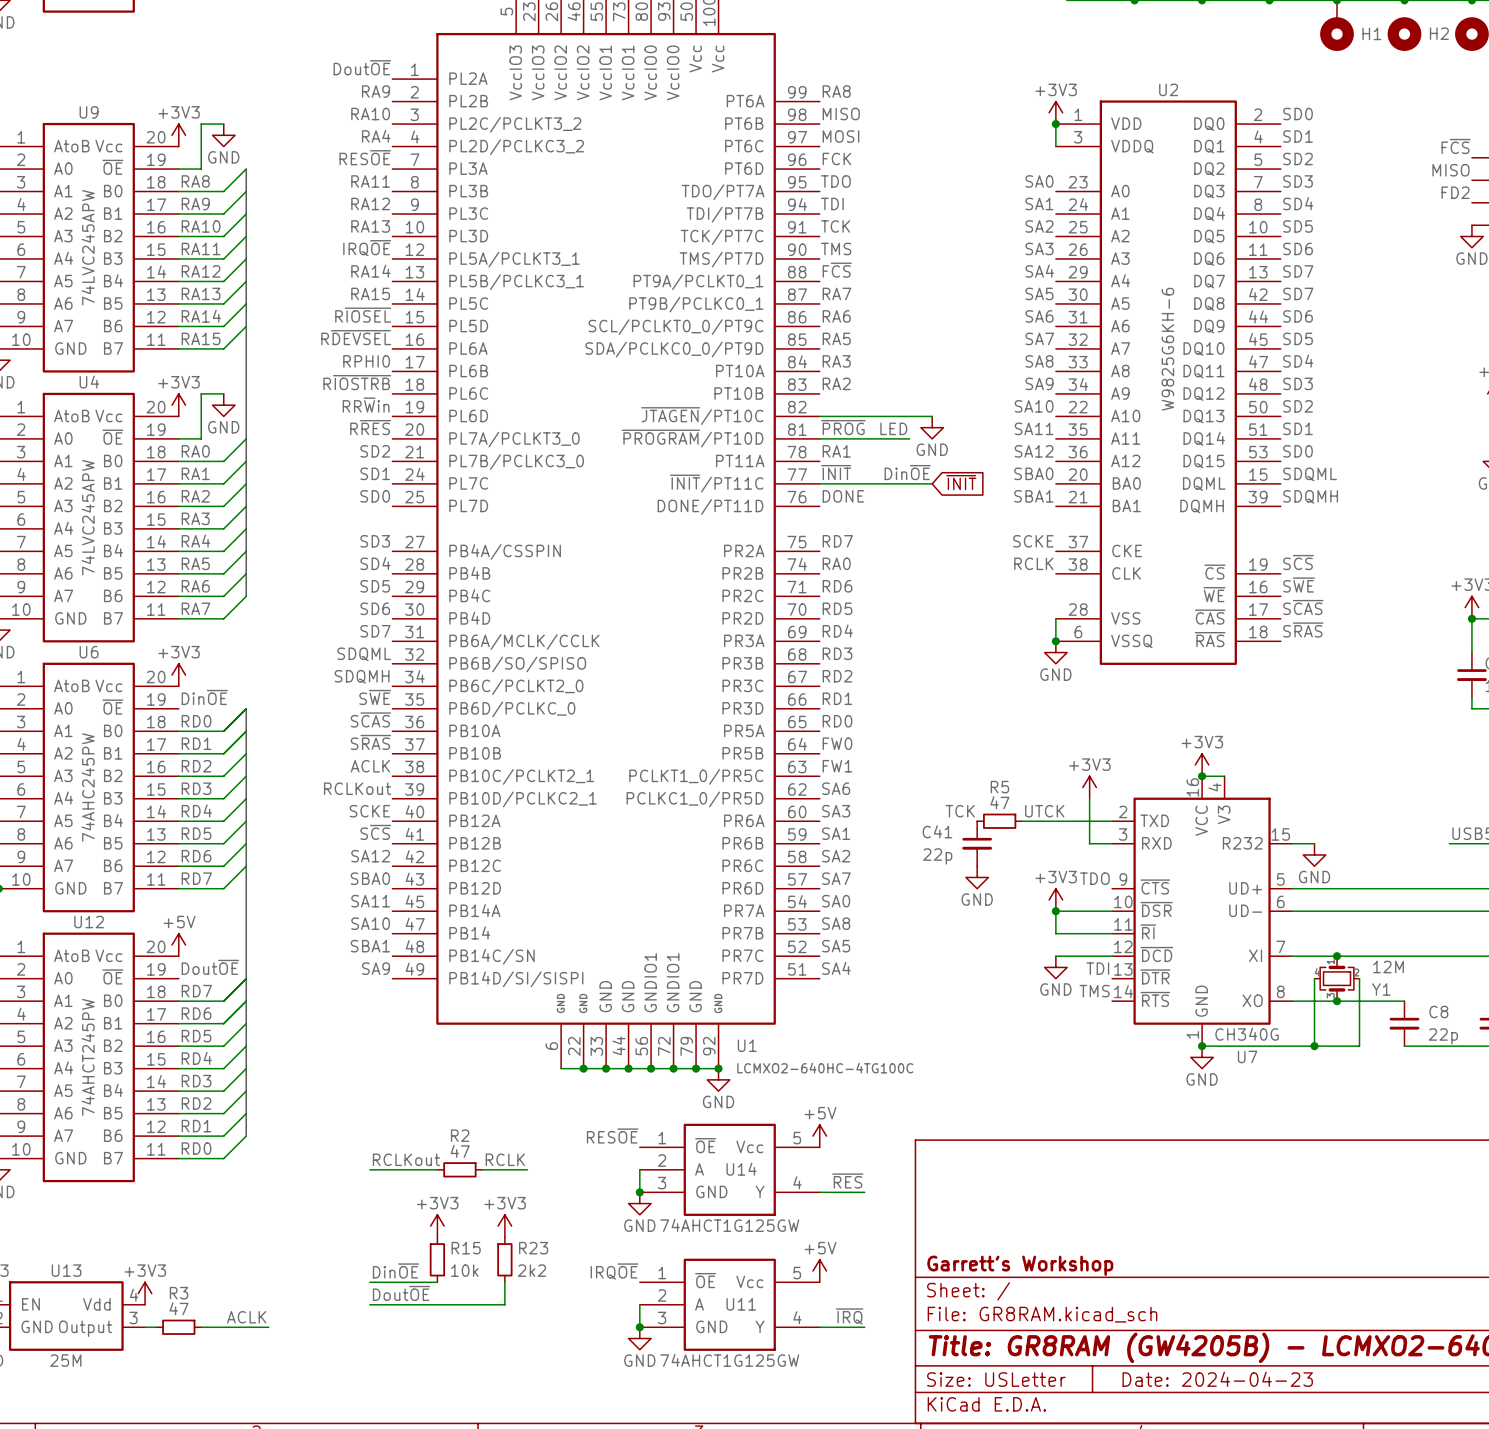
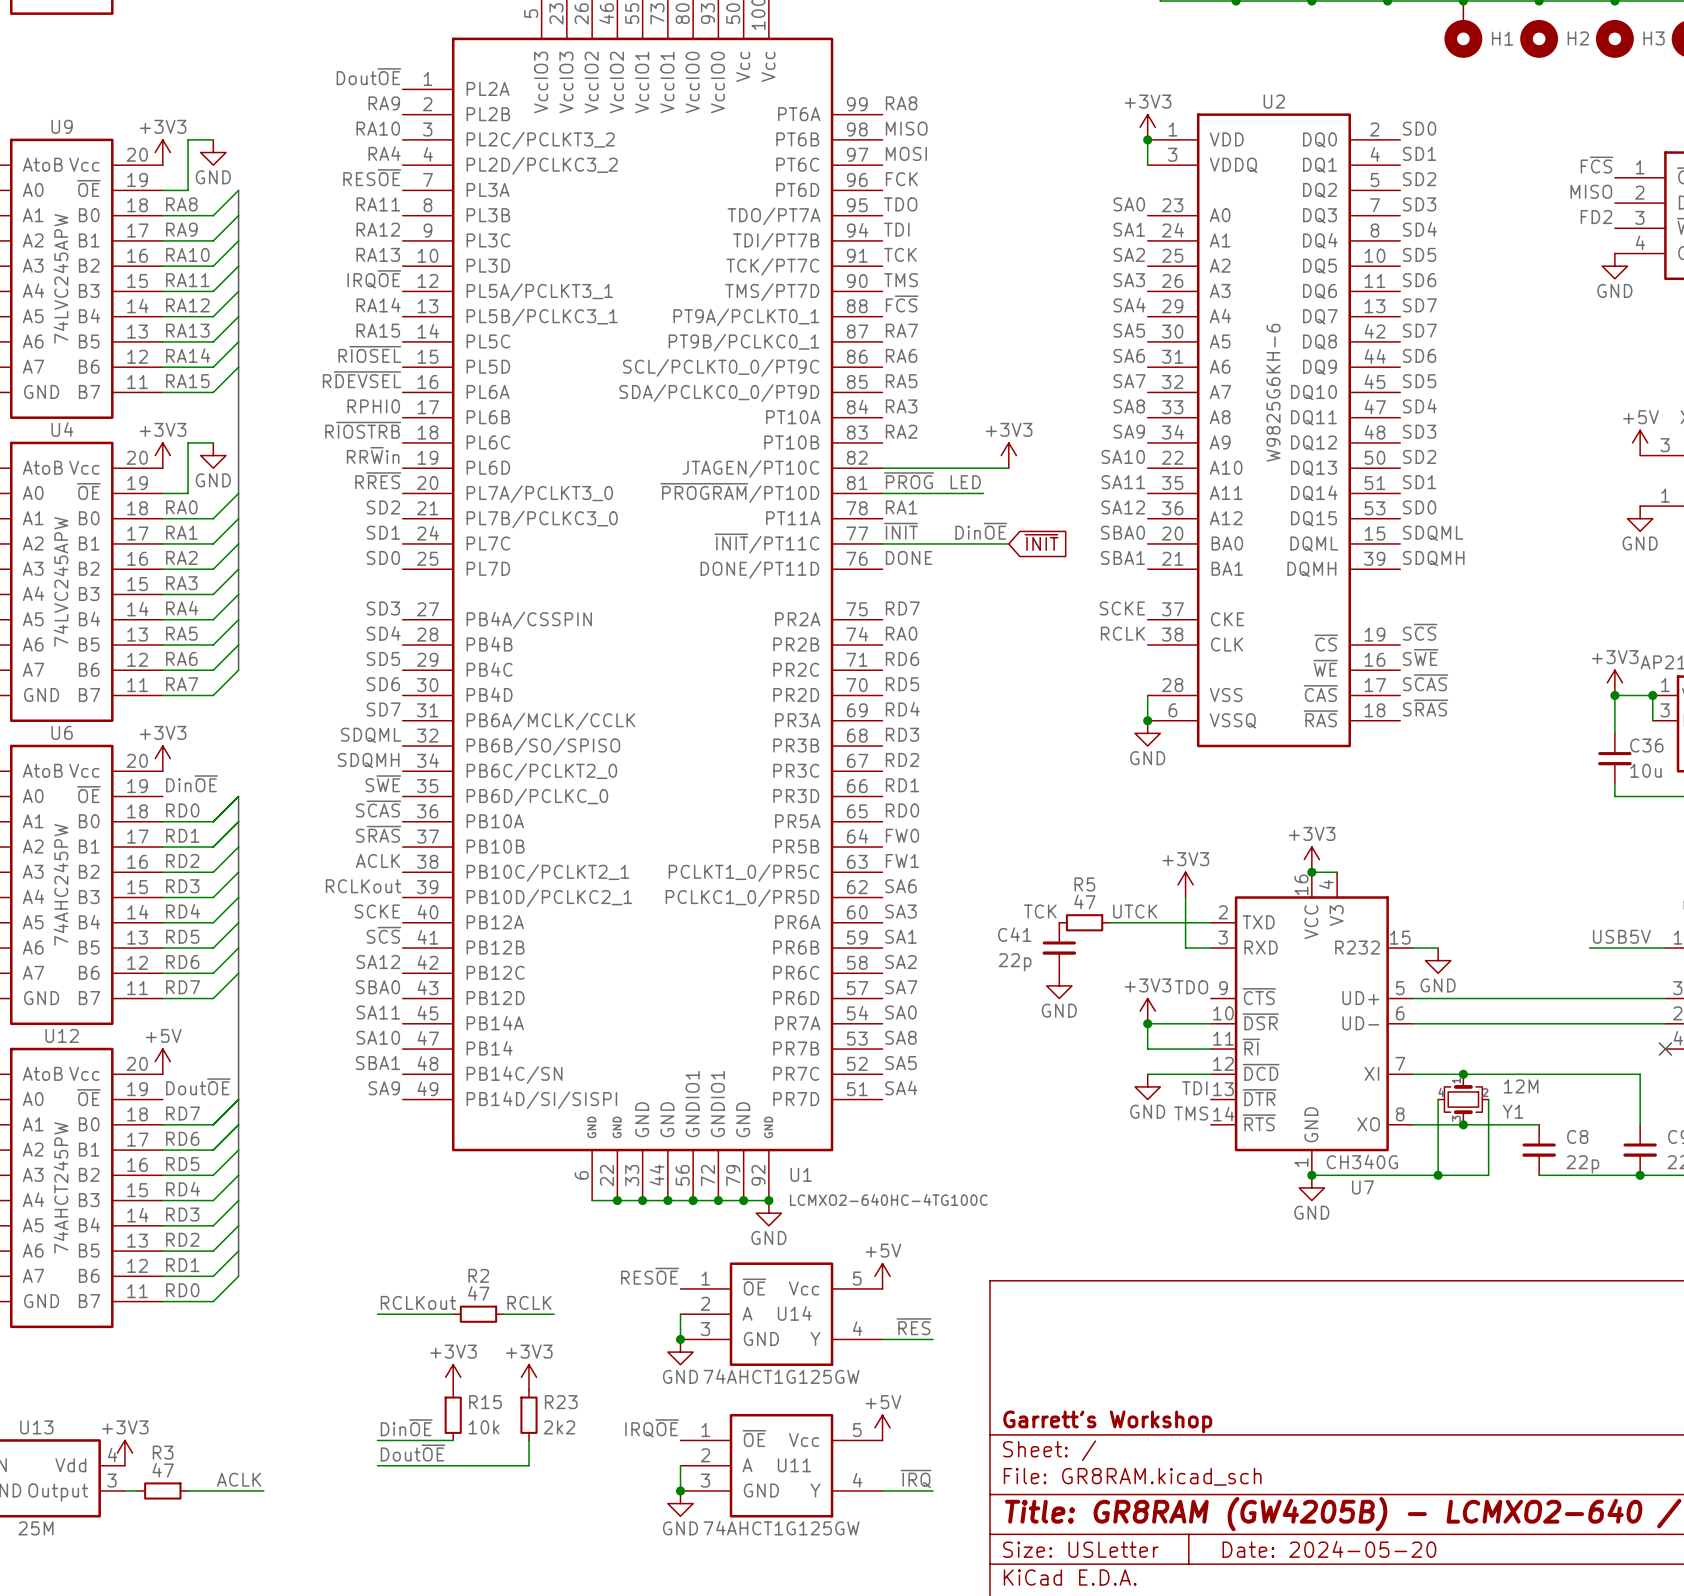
power symbol: none -> +3V3 (1008, 455)
U1 pin name: ~{JTAGEN}/PT10C (702, 416) -> JTAGEN/PT10C (750, 468)
power symbol: GND (932, 427) -> none
title block: Date: 2024-04-23 (1217, 1379) -> Date: 2024-05-20 (1329, 1549)

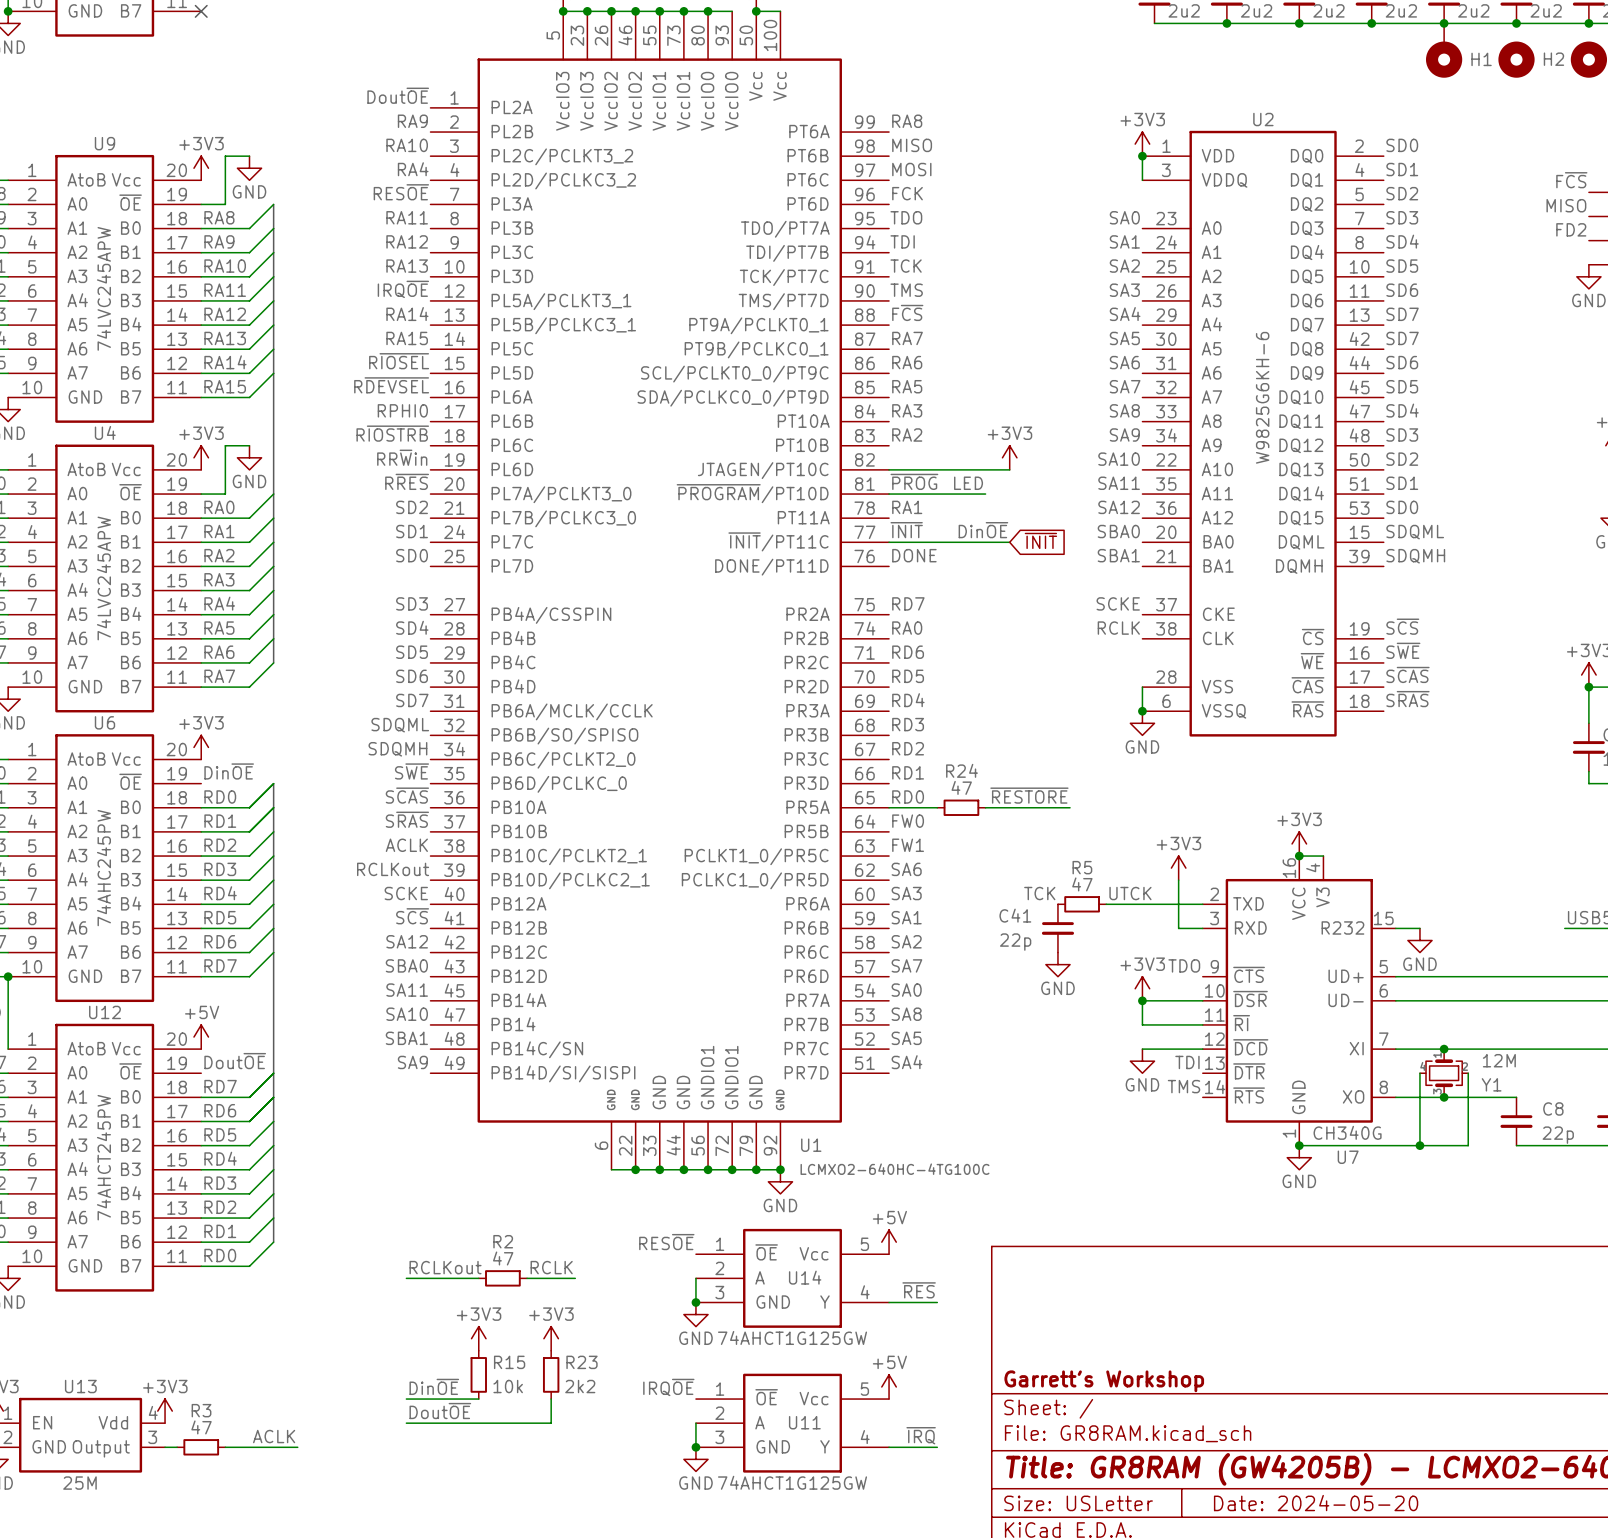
label: none -> ~{RESTORE} (1029, 795)
wire: none -> (889, 807) (937, 807)
R24: none -> 47 (961, 807)
wire: none -> (985, 807) (1070, 807)

